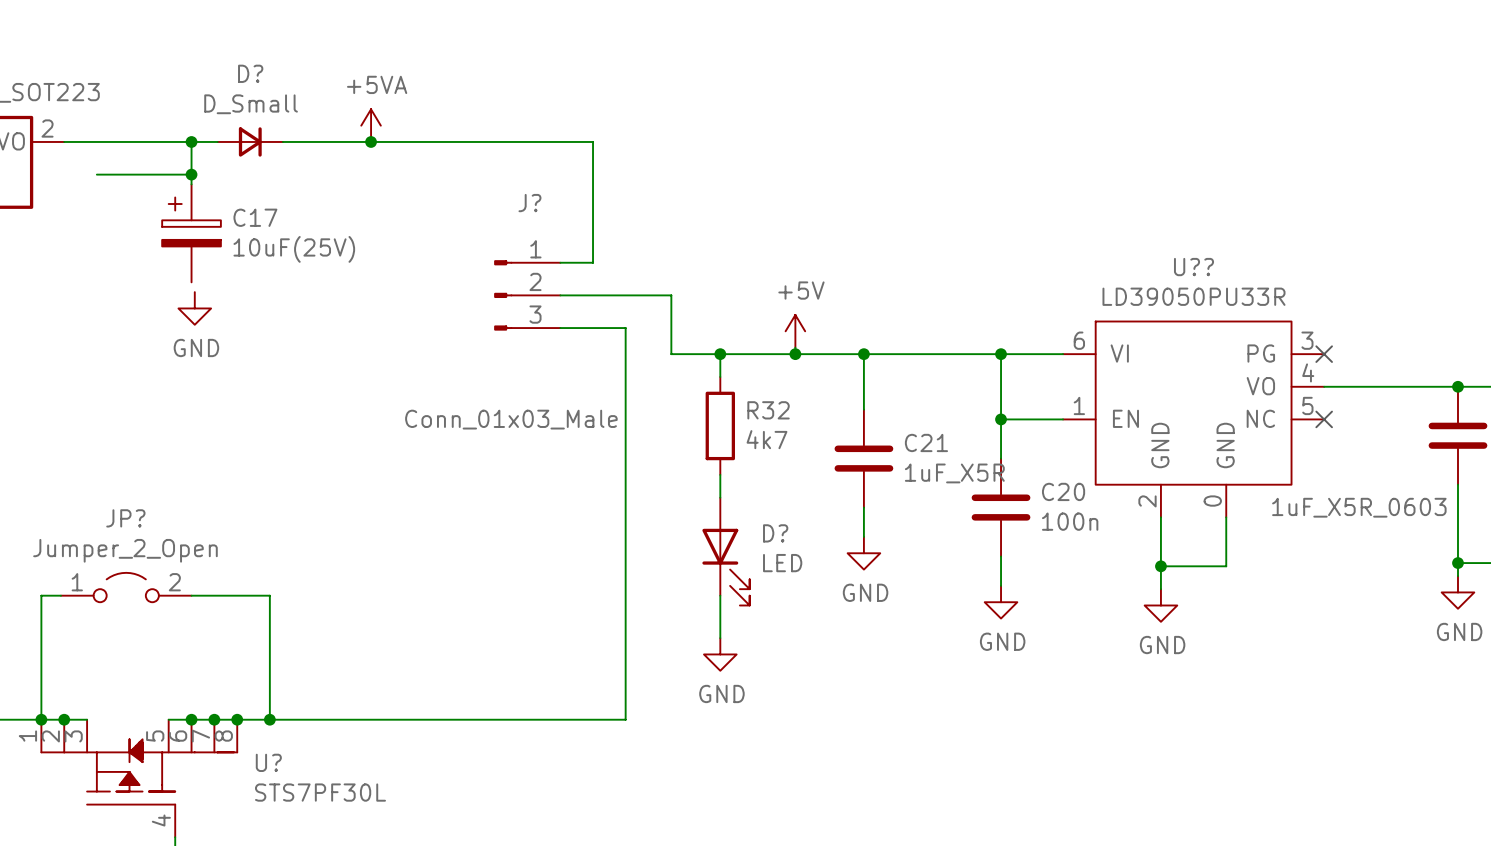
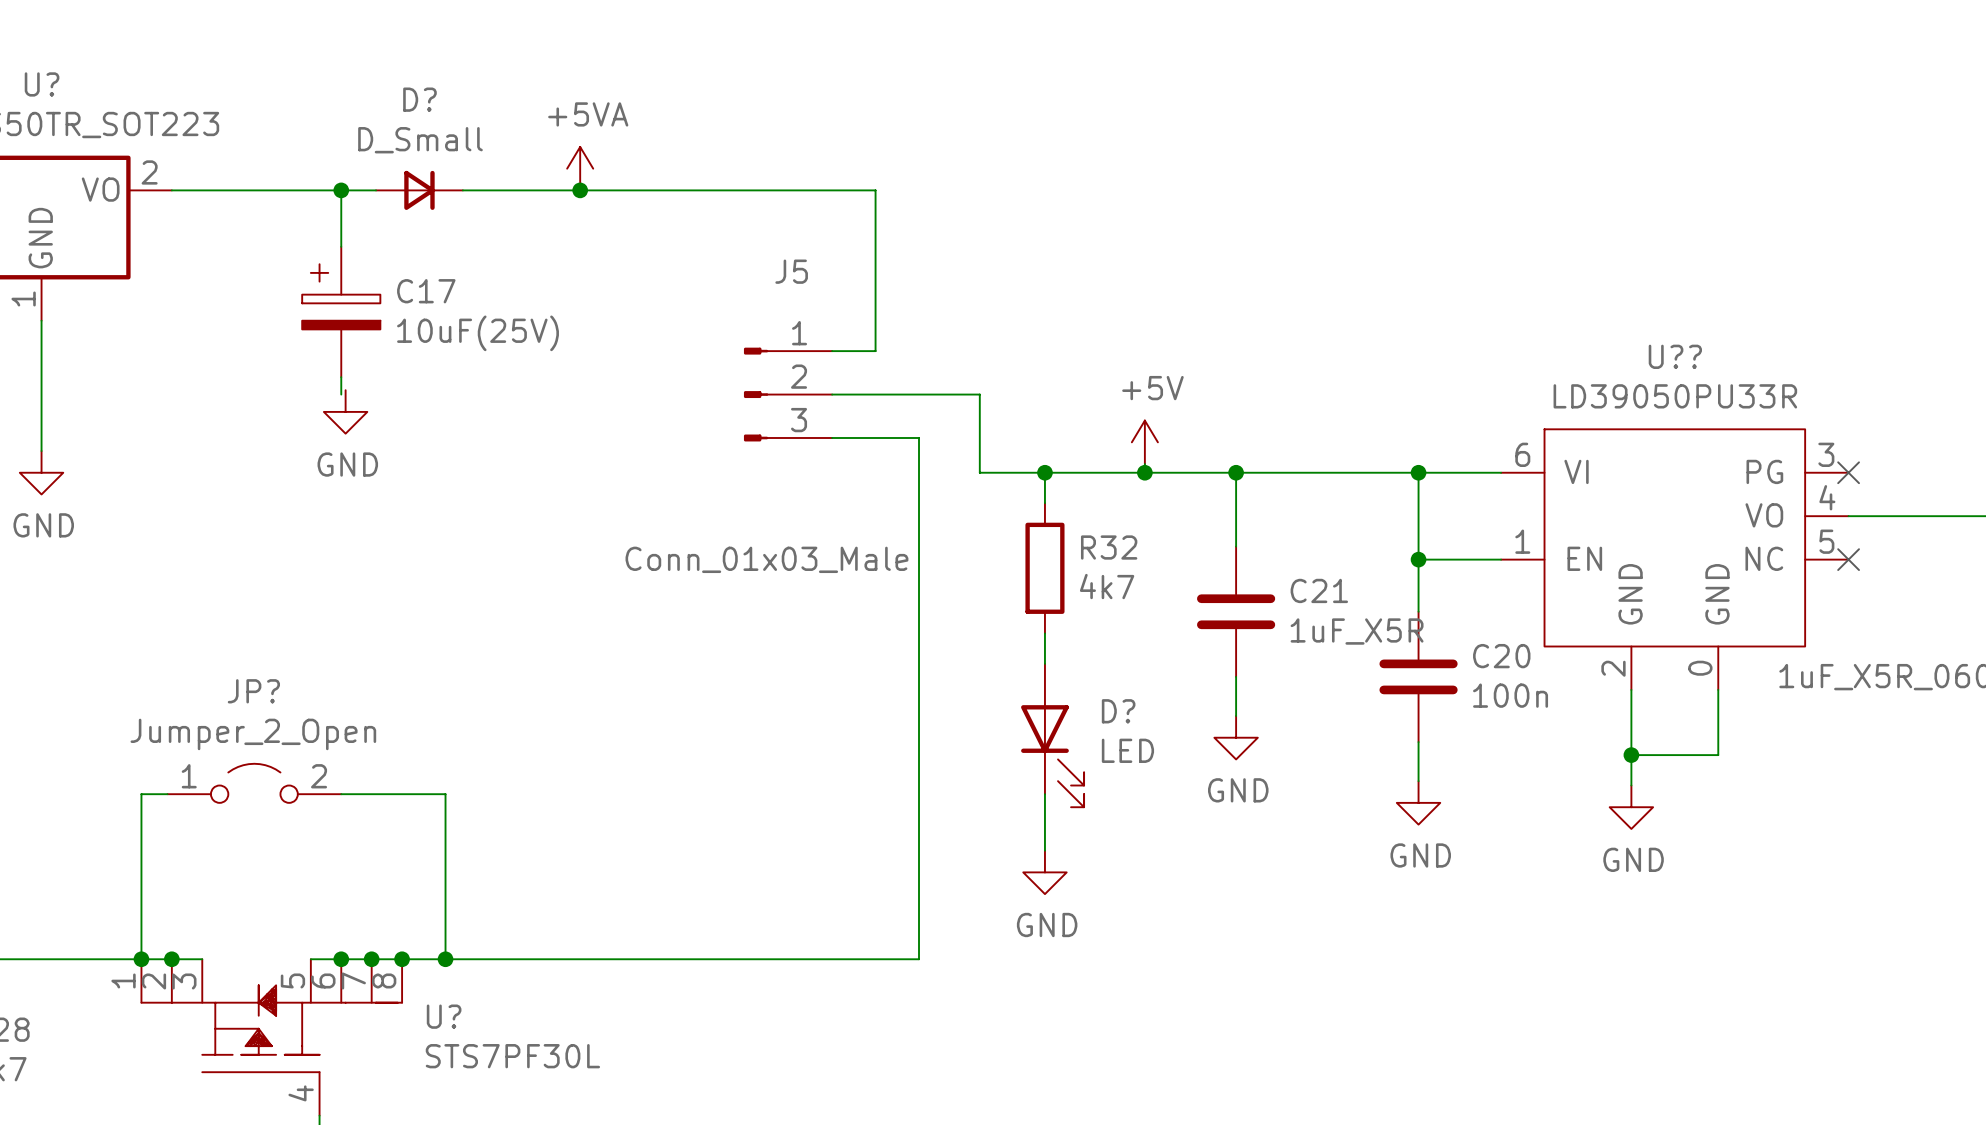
wire: (96, 174) (191, 174) -> none
junction: (191, 174) -> none
J? name: J? (529, 203) -> J5 (791, 271)
wire: none -> (341, 377) (341, 394)

